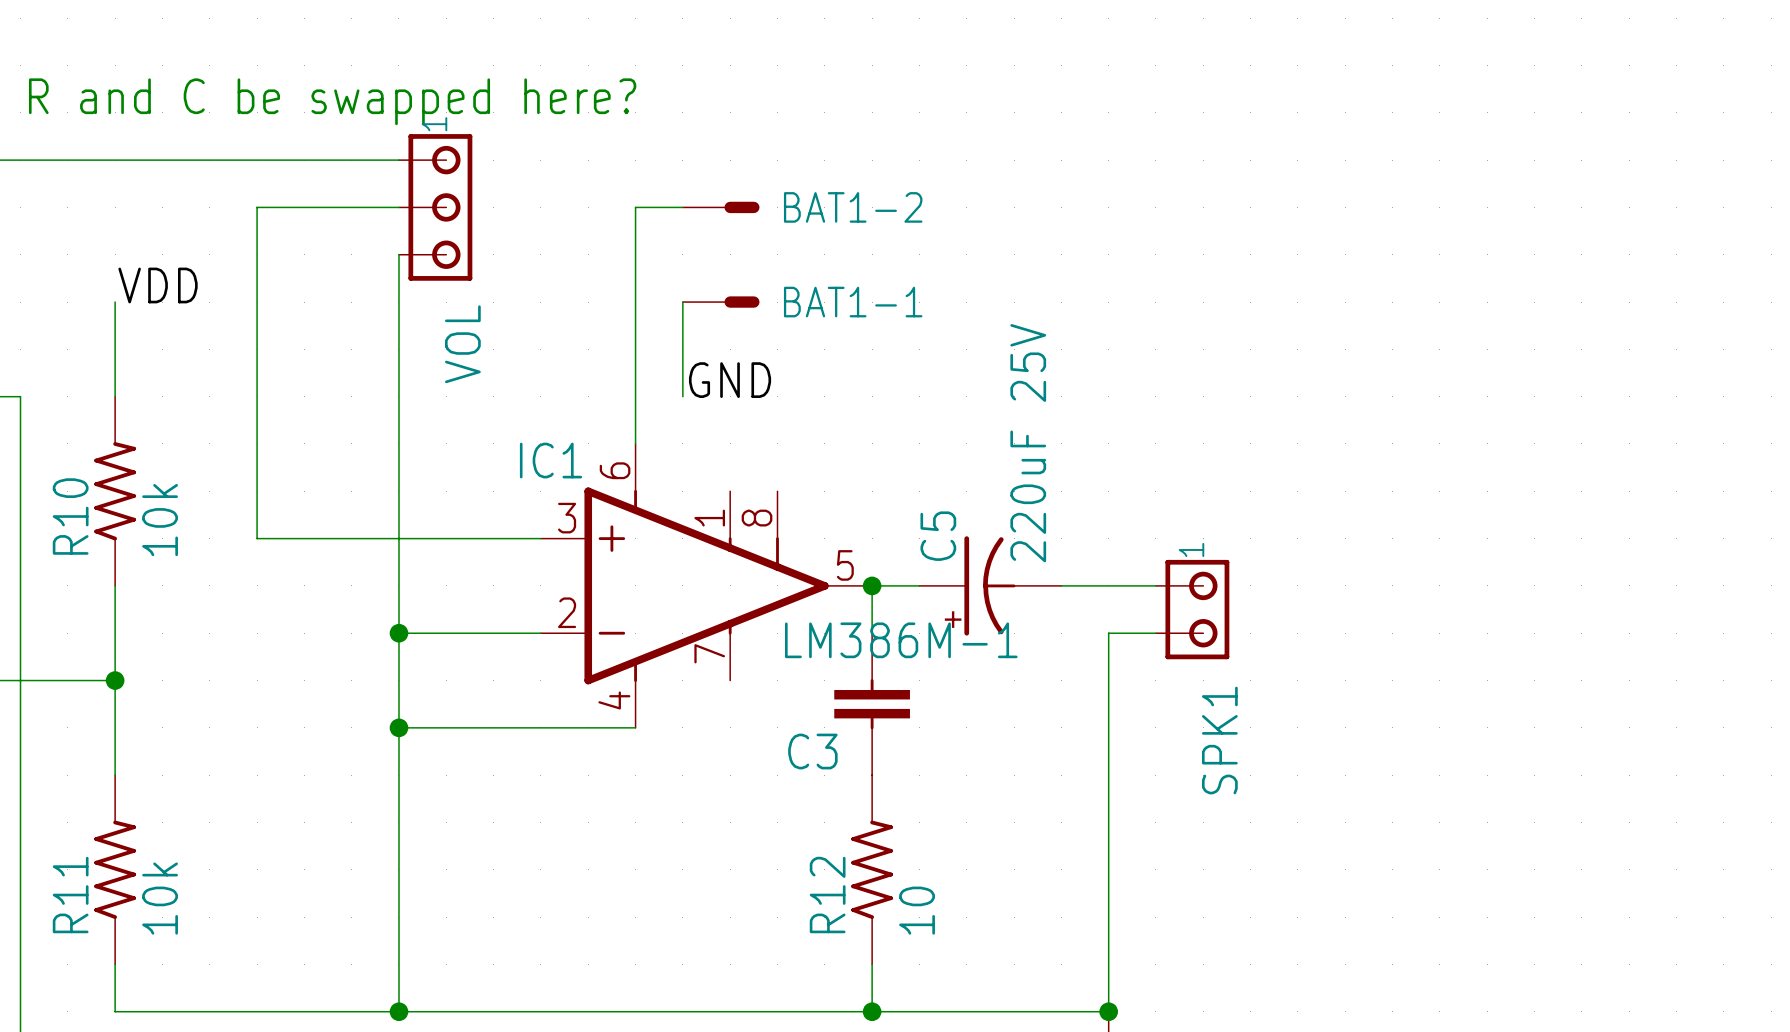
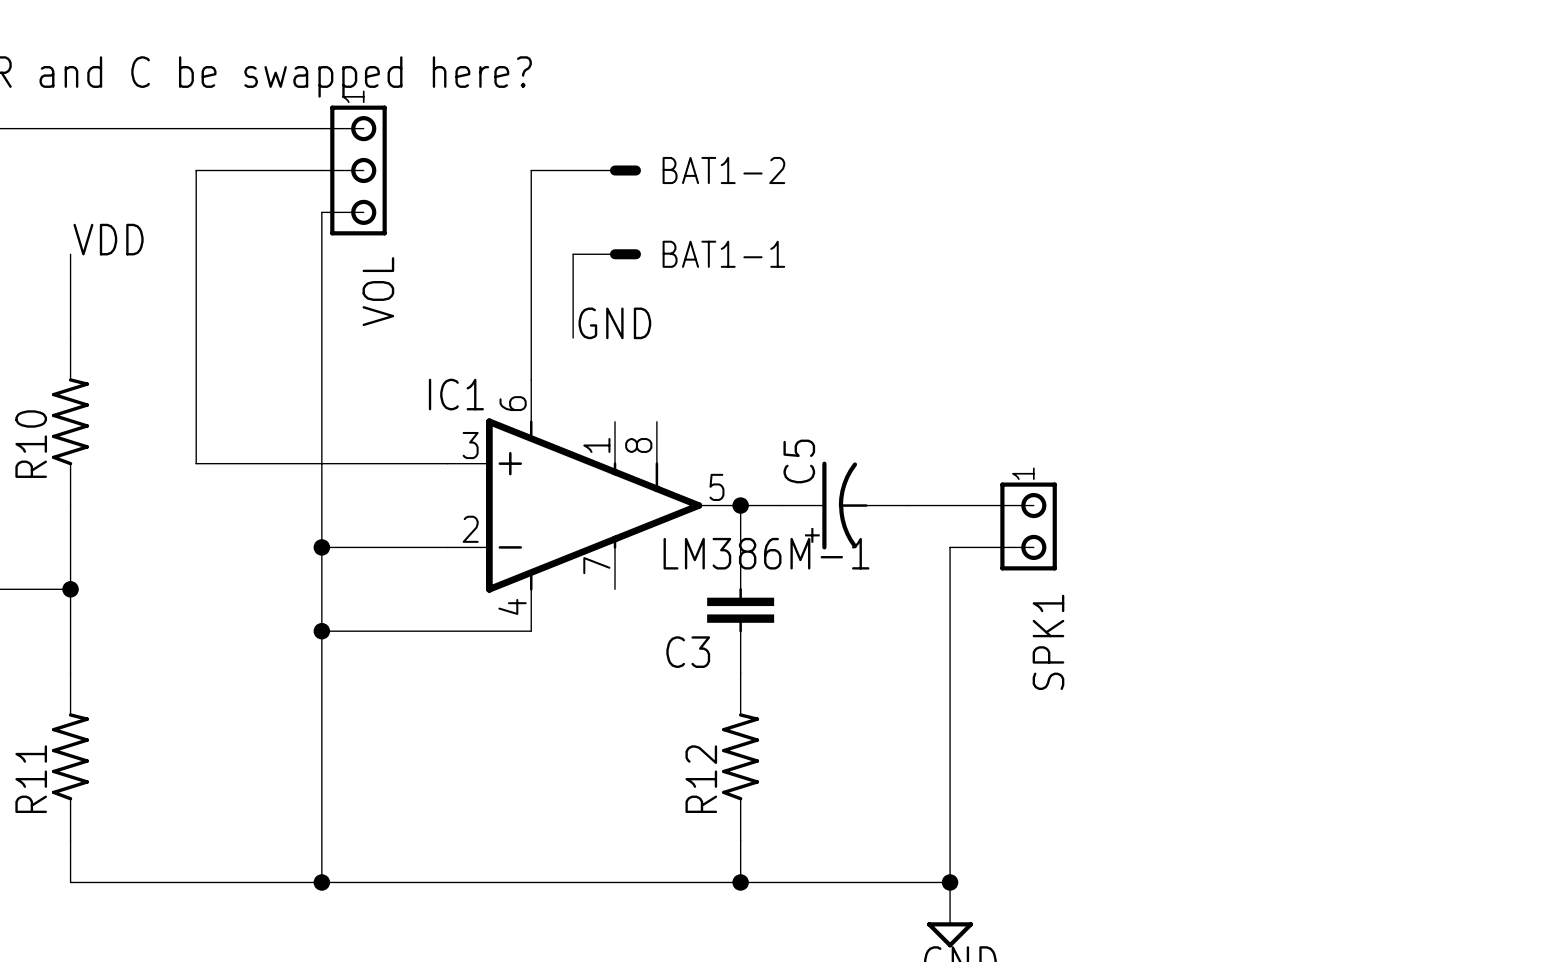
C5 value: 220uF 25V (1028, 443) -> none
R10 value: 10k (160, 520) -> none
R11 value: 10k (160, 898) -> none
R12 value: 10 (917, 910) -> none

